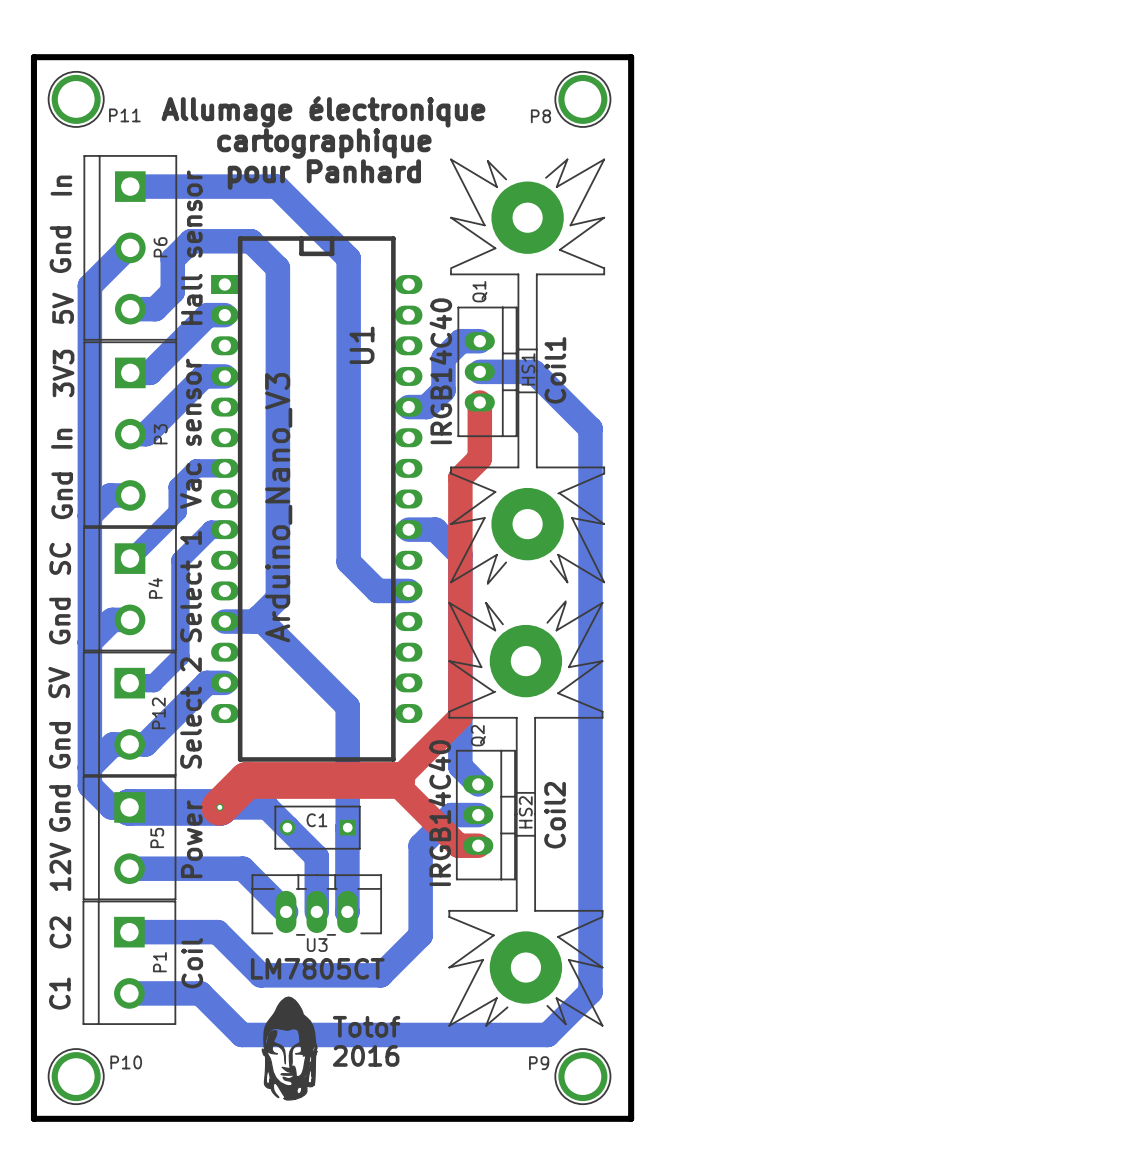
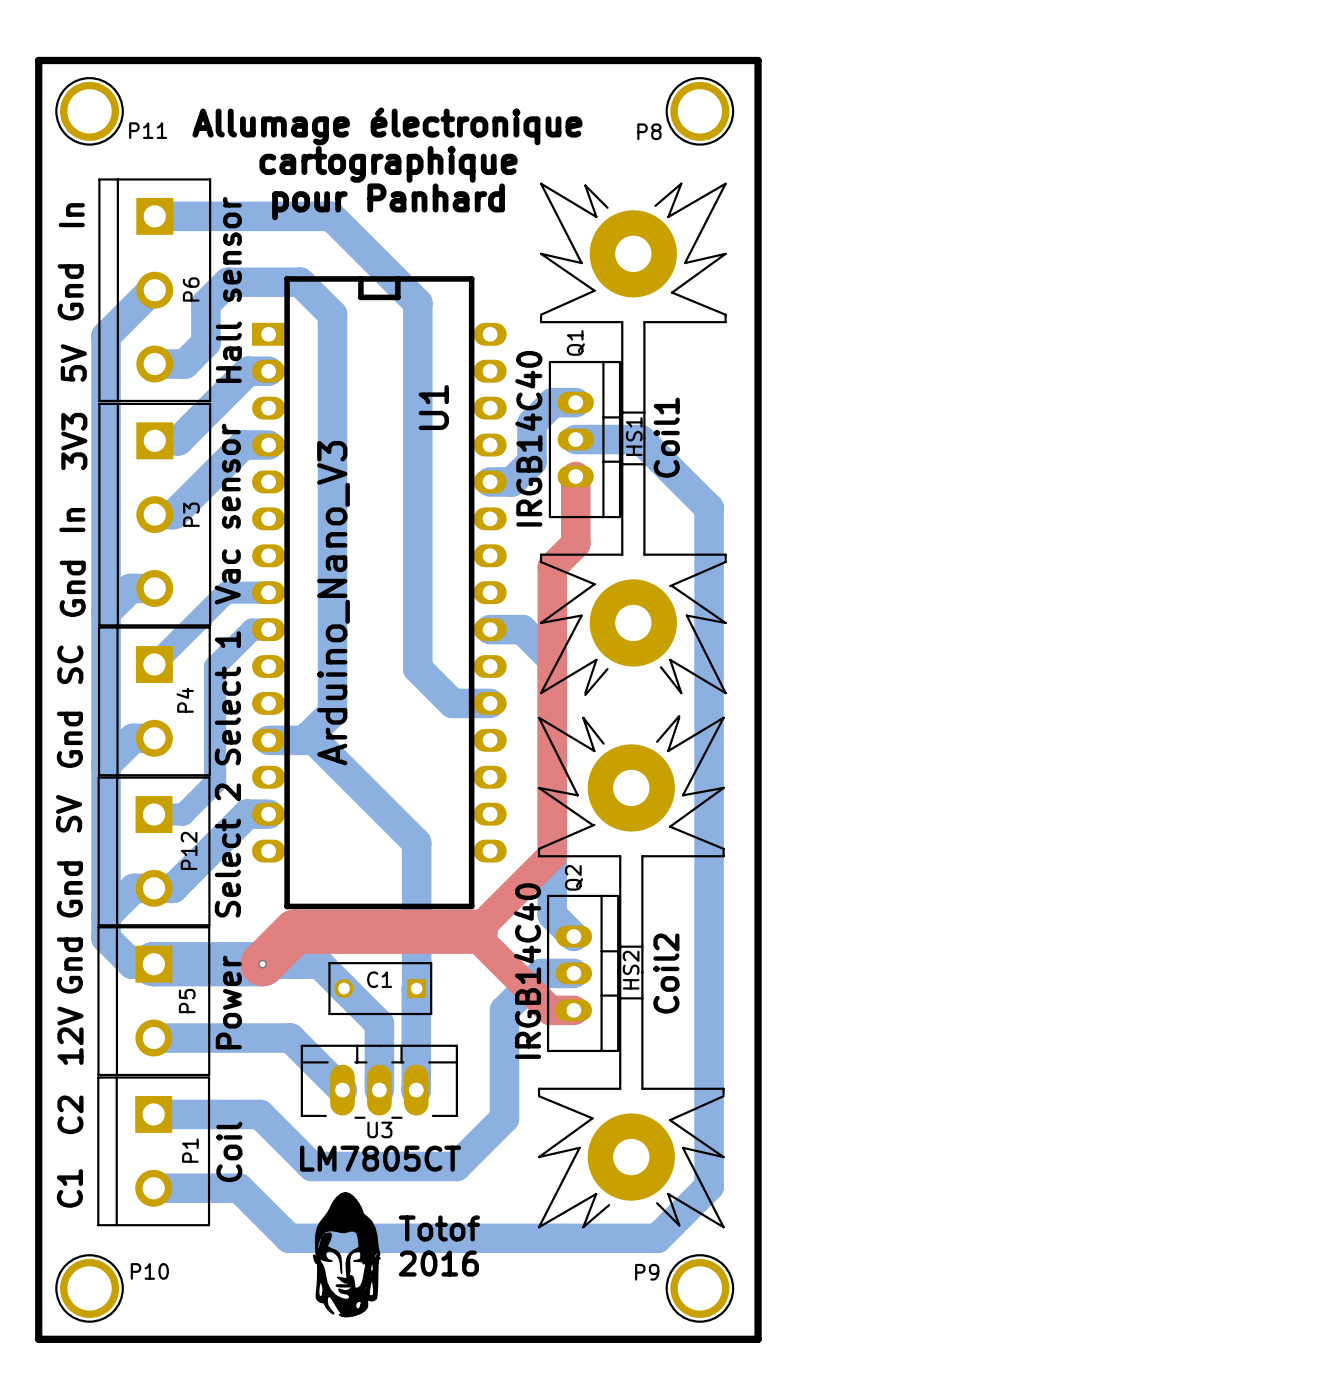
bottom track: (224, 468) (196, 468) (177, 487) (177, 511) (130, 558) -> none
bottom track: none -> (268, 592) (226, 592) (154, 664)

